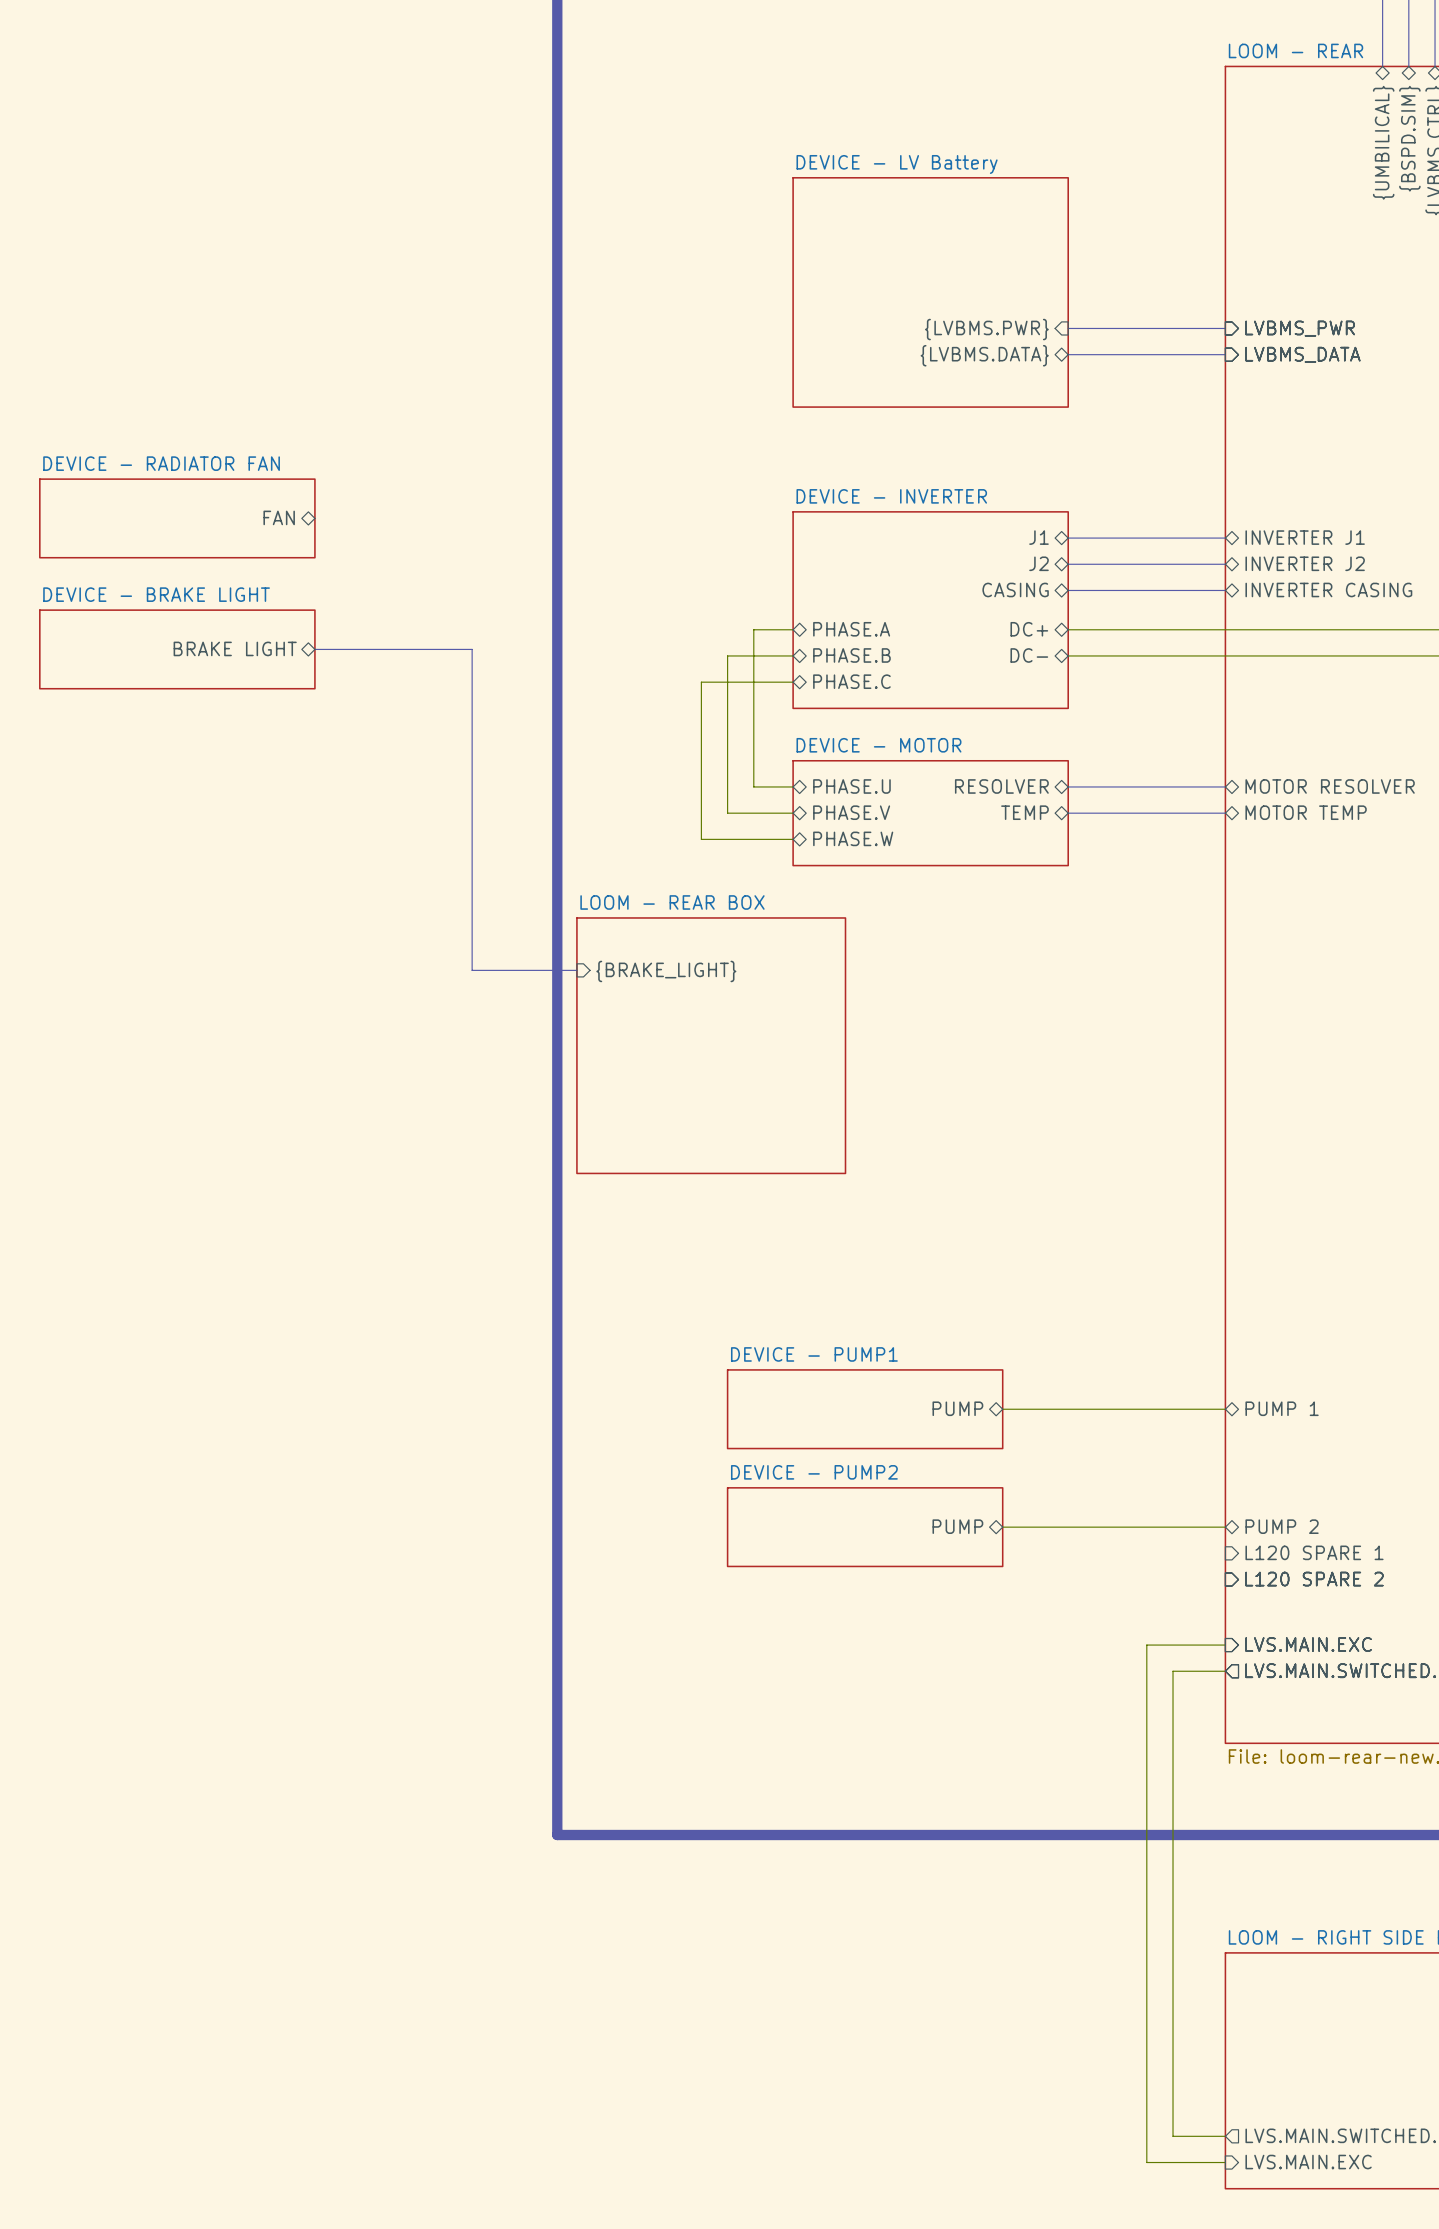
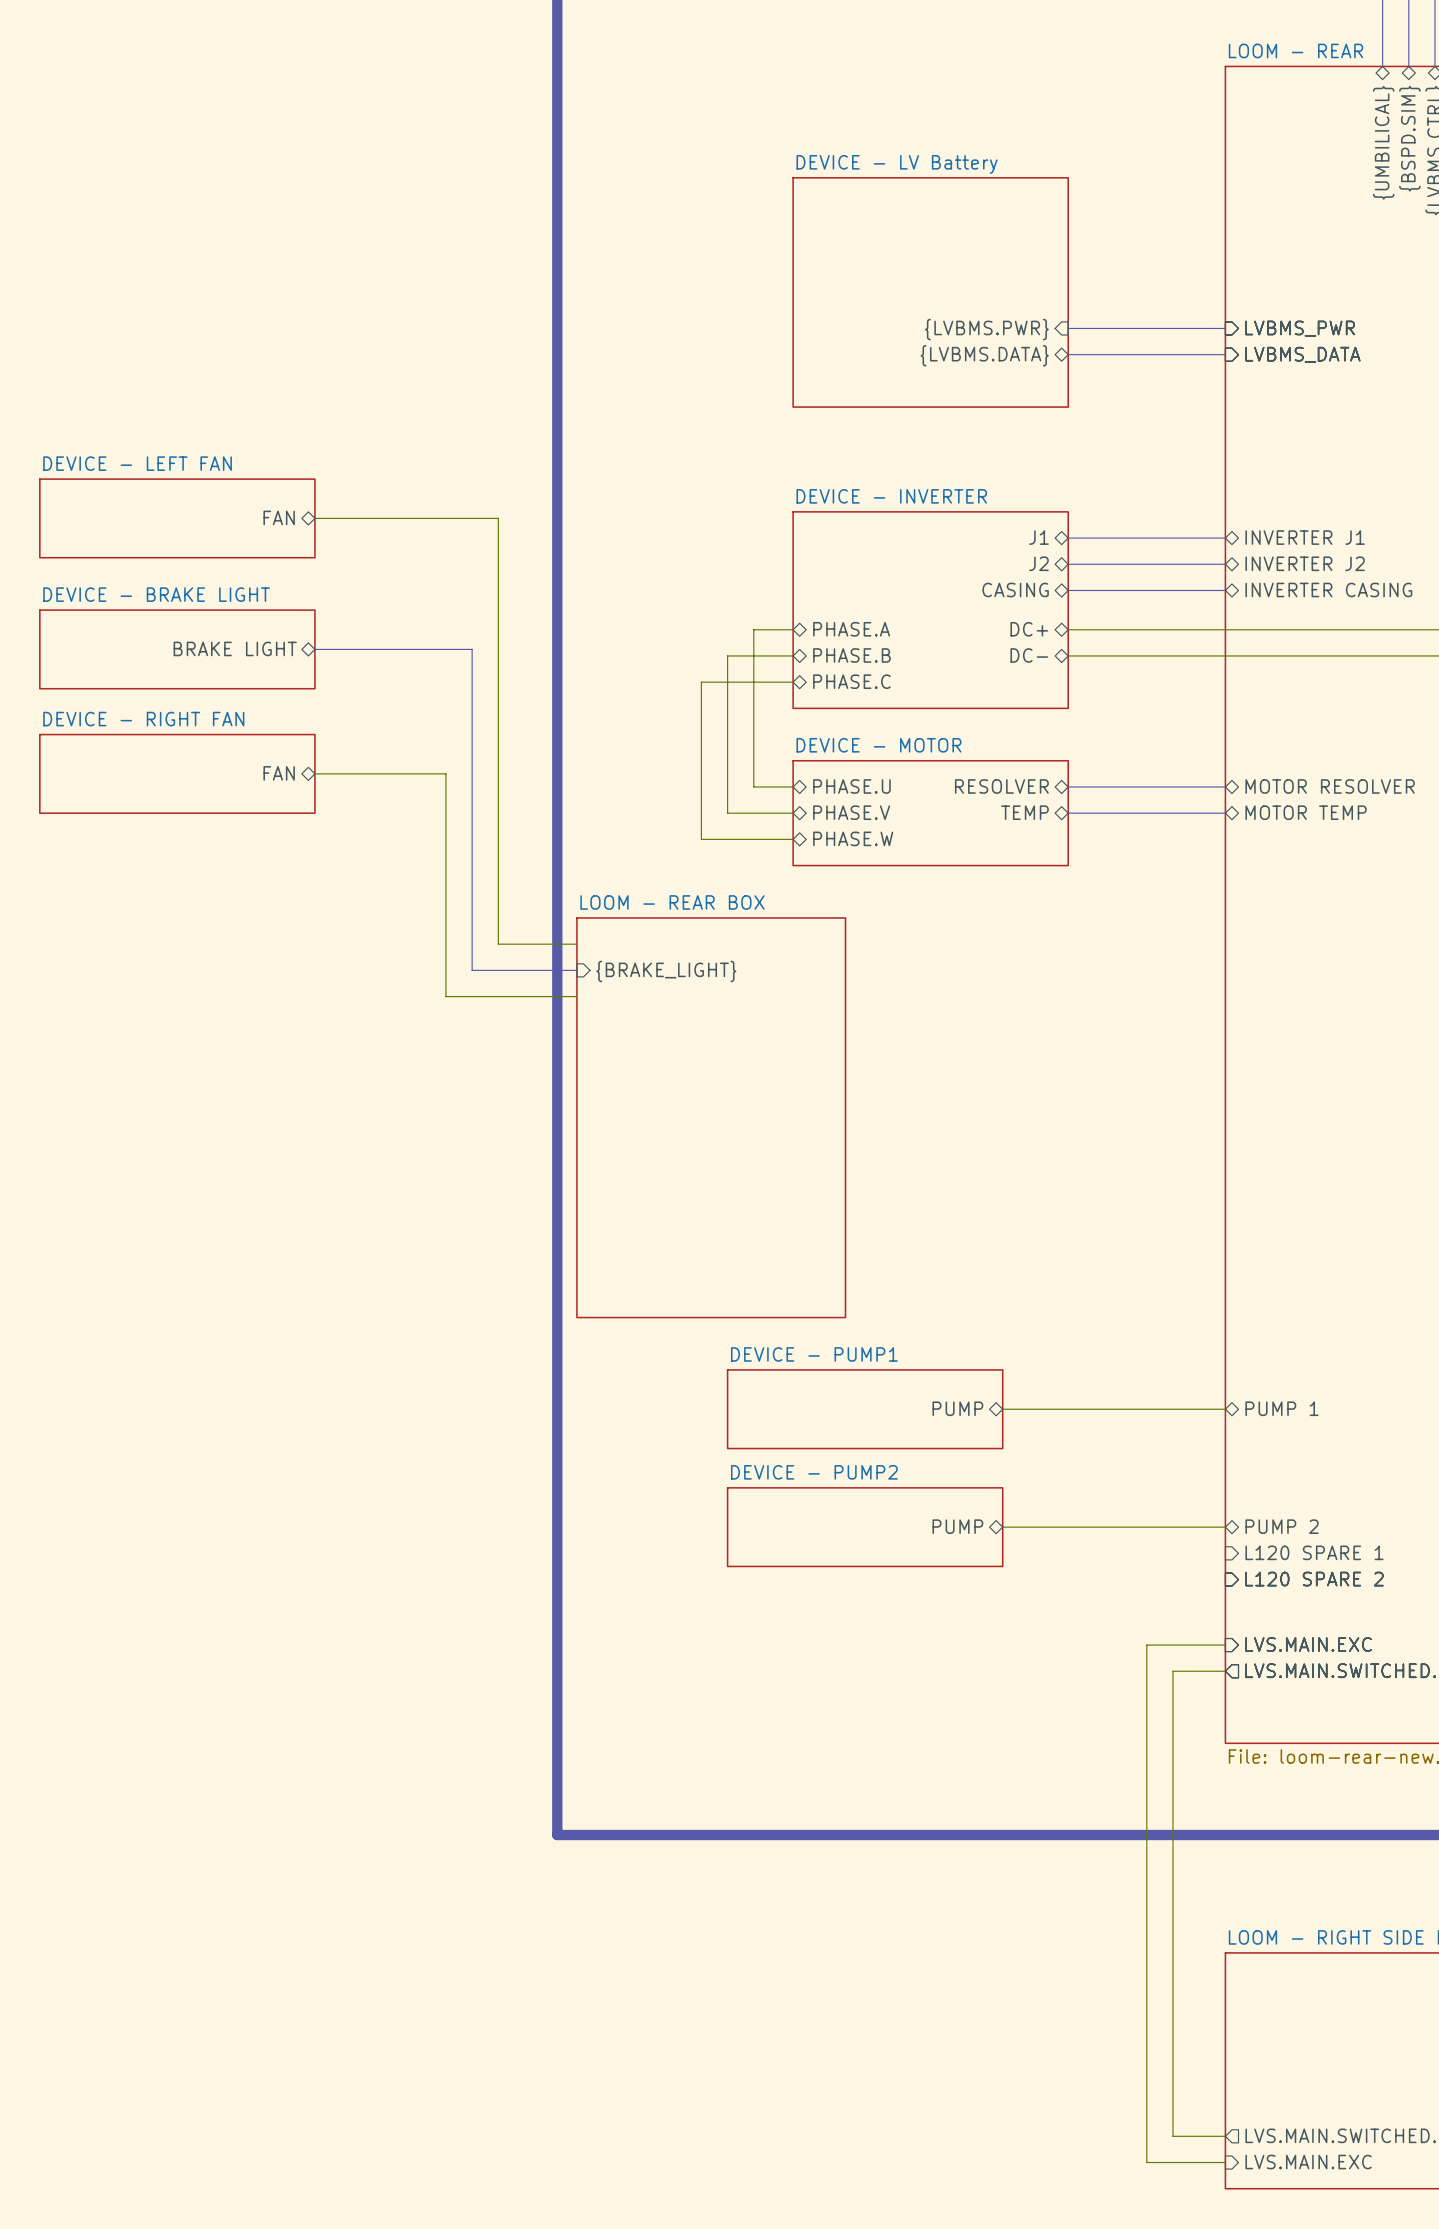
sheet DEVICE - RADIATOR FAN name: DEVICE - RADIATOR FAN (161, 463) -> DEVICE - LEFT FAN (137, 463)
wire: none -> (314, 518) (498, 518) (498, 944) (576, 944)
sheet DEVICE - RIGHT FAN: none -> (177, 773)
sheet pin: none -> FAN (279, 773)
wire: none -> (314, 773) (445, 773) (445, 996) (576, 996)
sheet LOOM - REAR BOX: (711, 1045) -> none
sheet LOOM - REAR BOX: none -> (711, 1117)

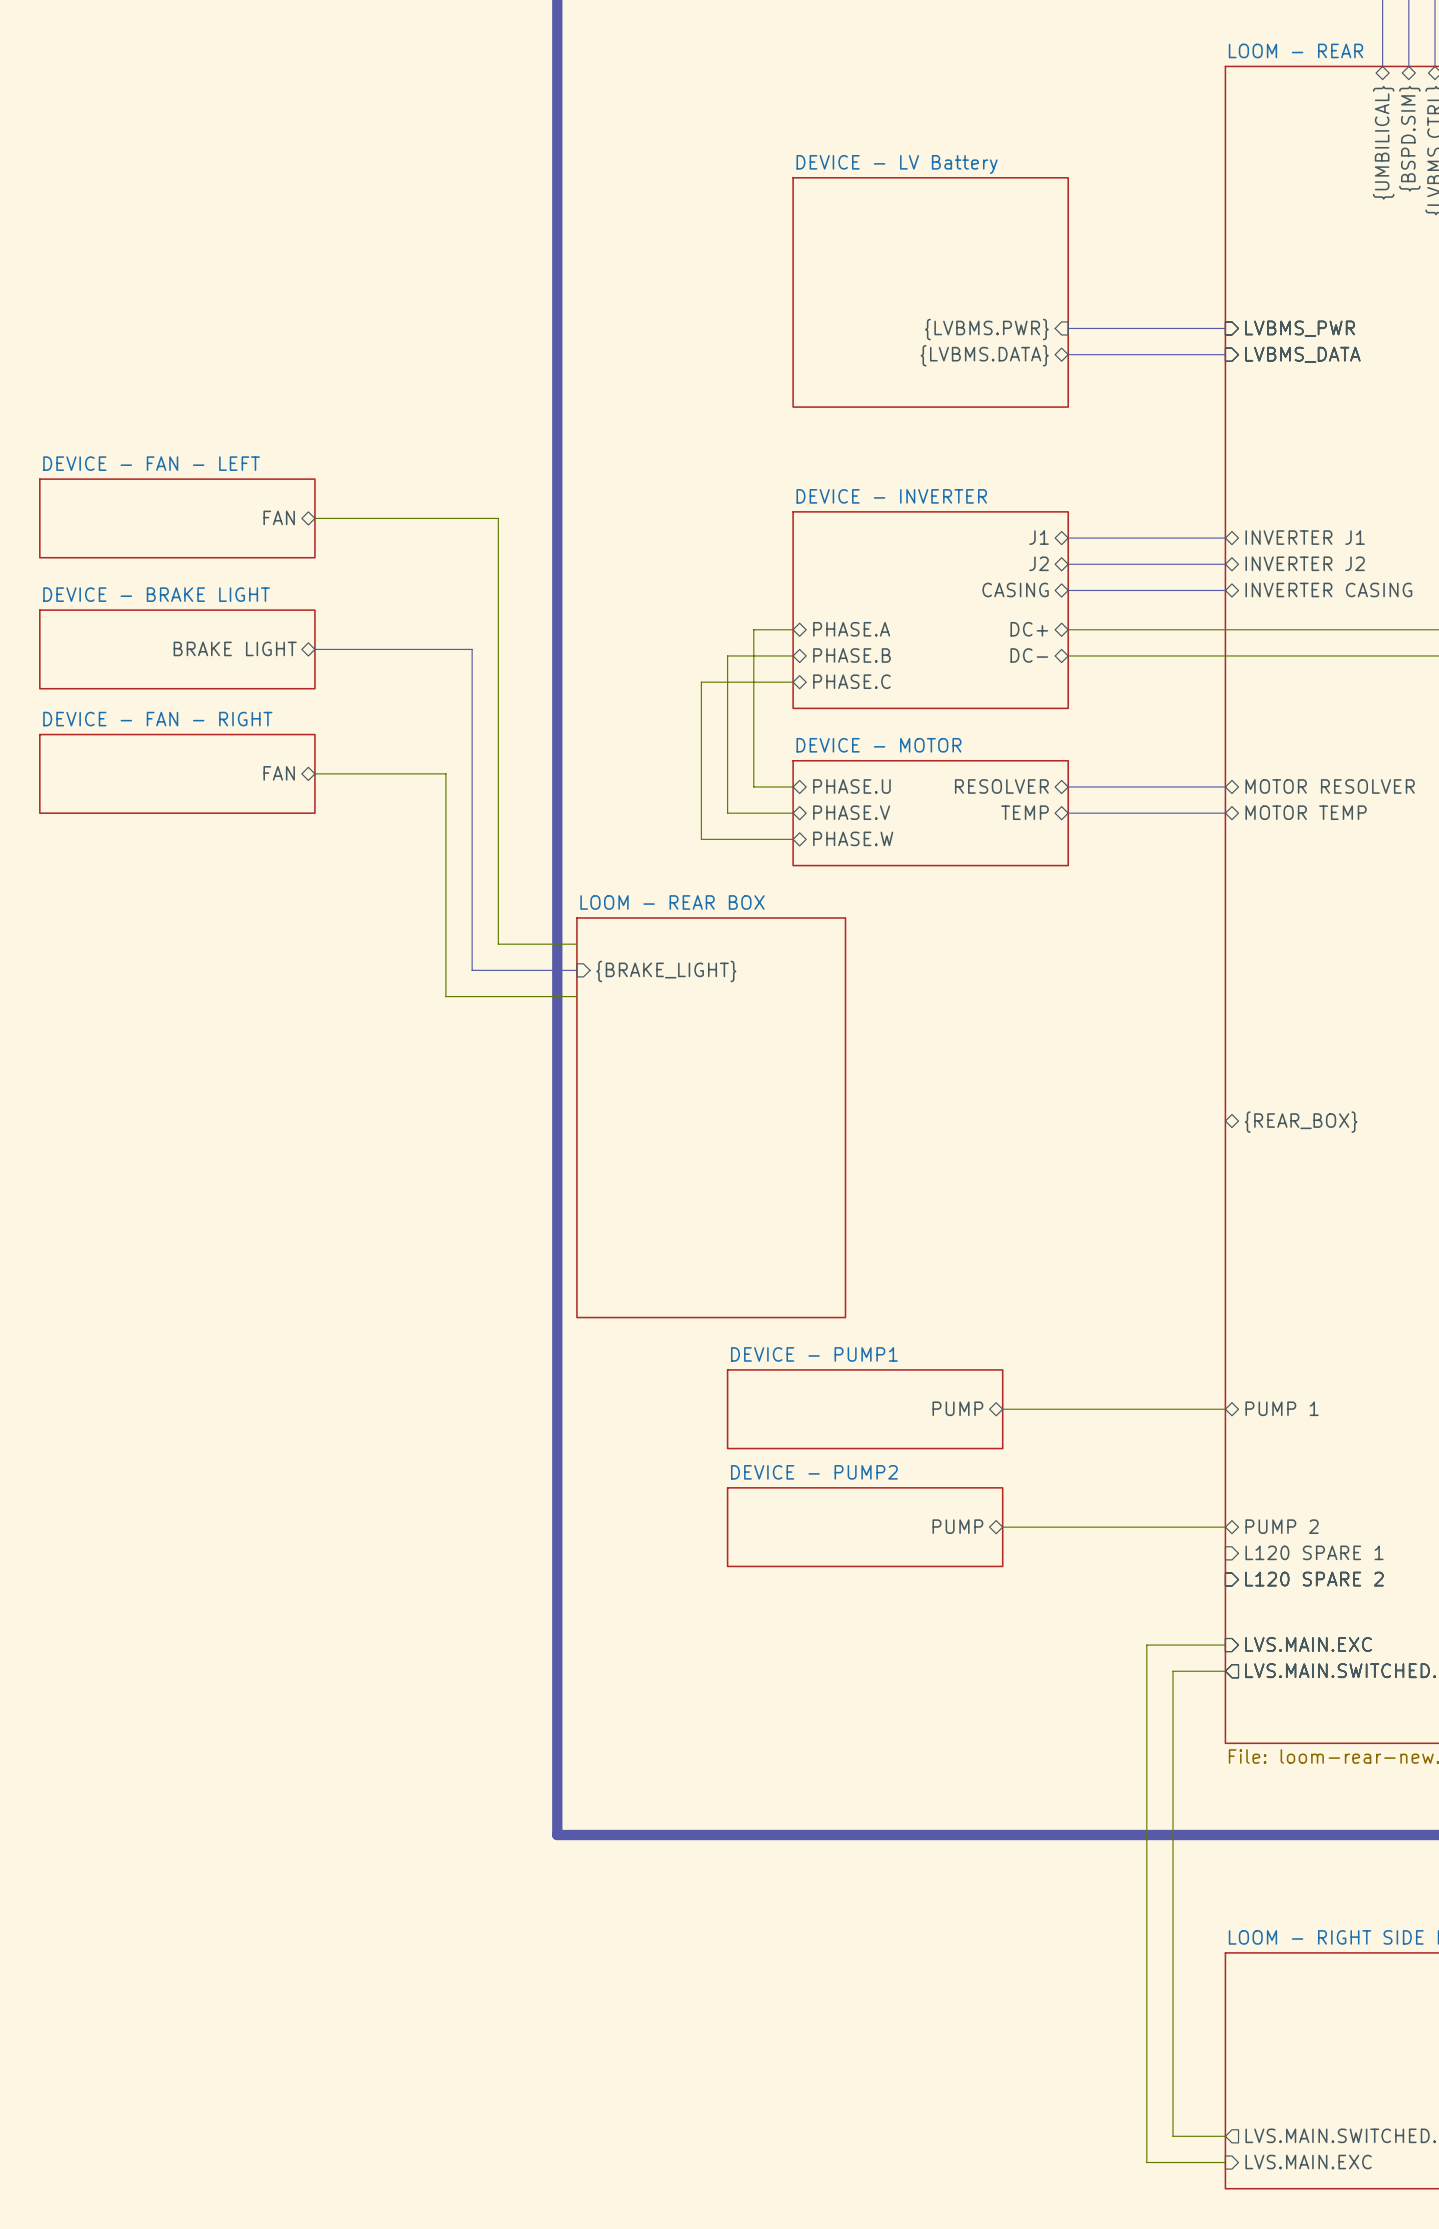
sheet DEVICE - LEFT FAN name: DEVICE - LEFT FAN (137, 463) -> DEVICE - FAN - LEFT (151, 463)
sheet DEVICE - RIGHT FAN name: DEVICE - RIGHT FAN (143, 719) -> DEVICE - FAN - RIGHT (157, 719)
sheet pin: none -> {REAR_BOX} (1301, 1122)

